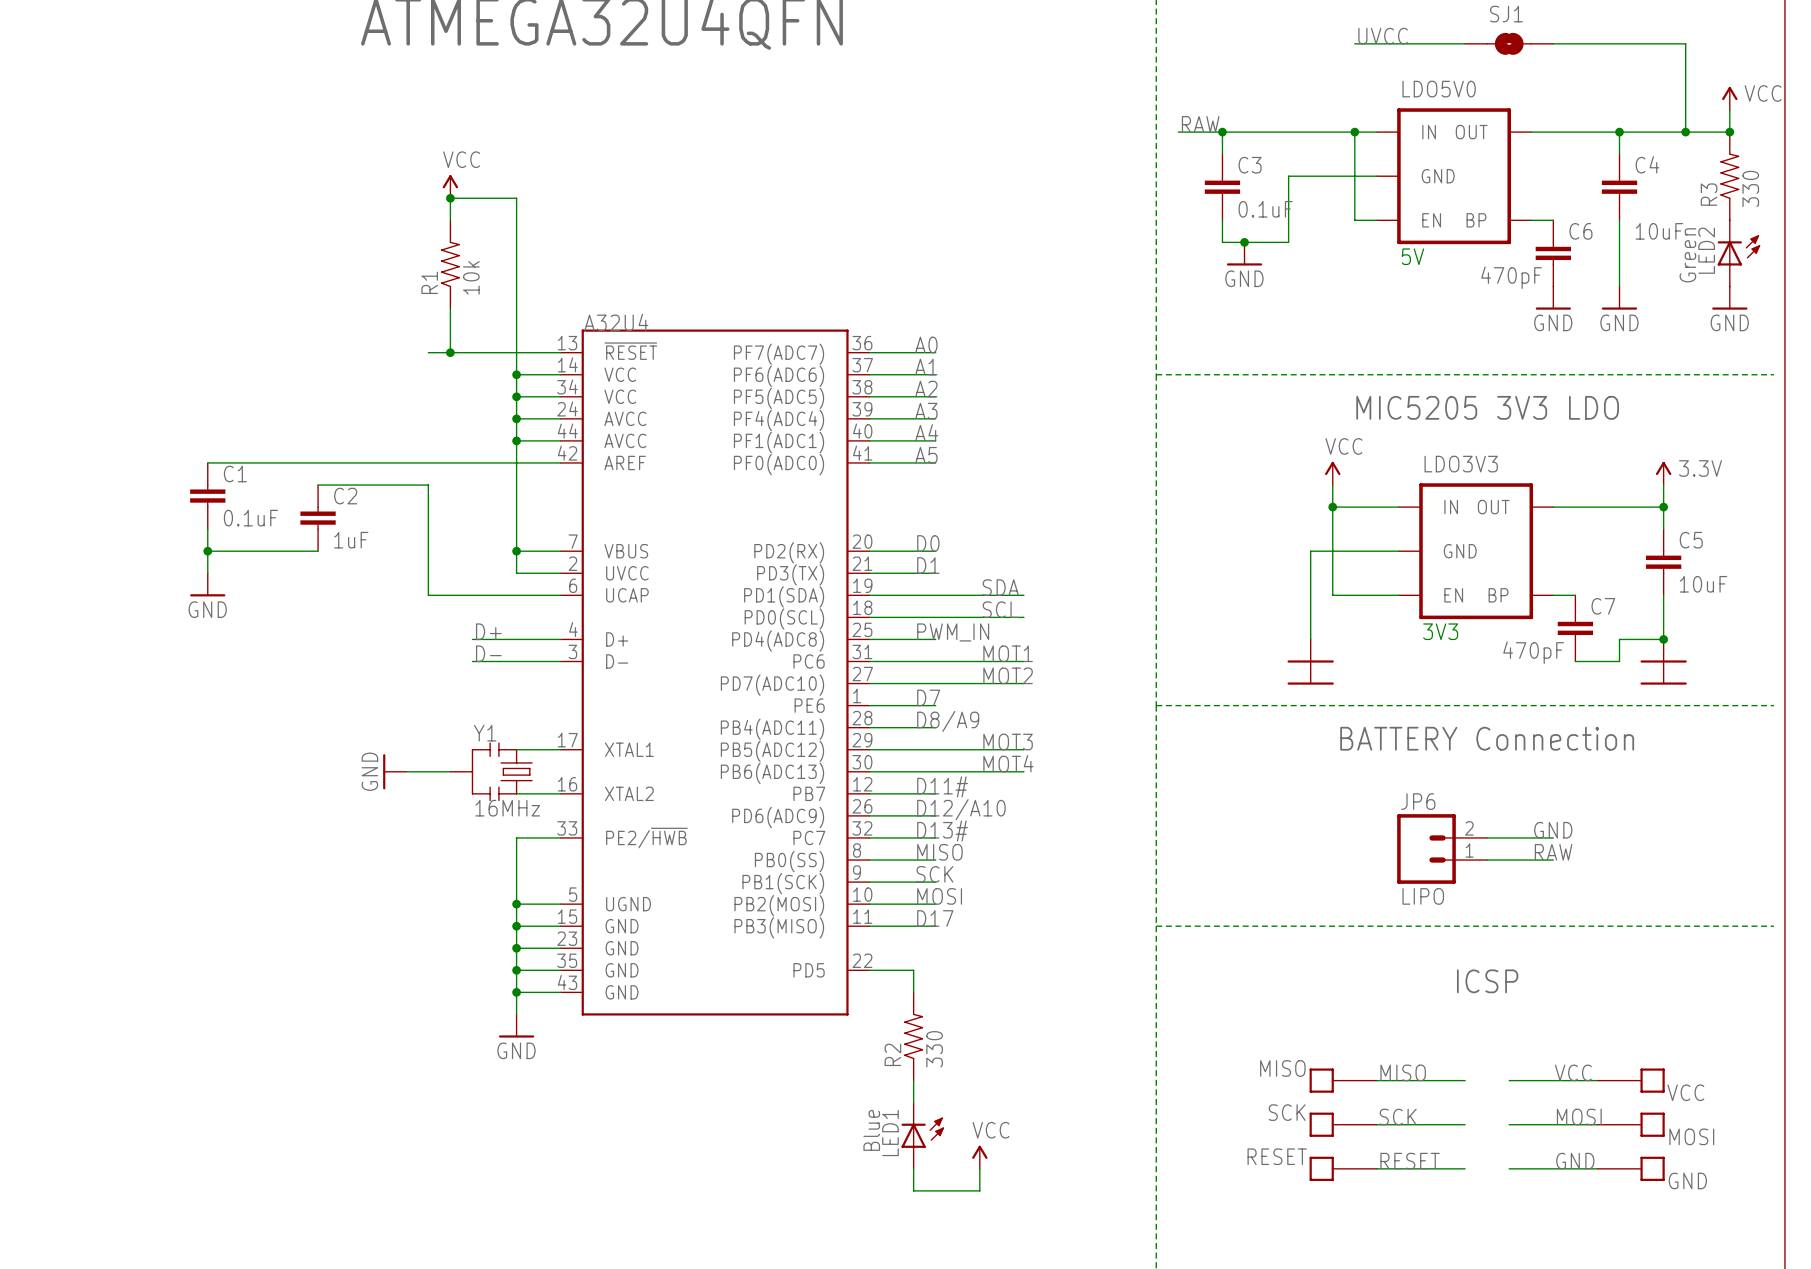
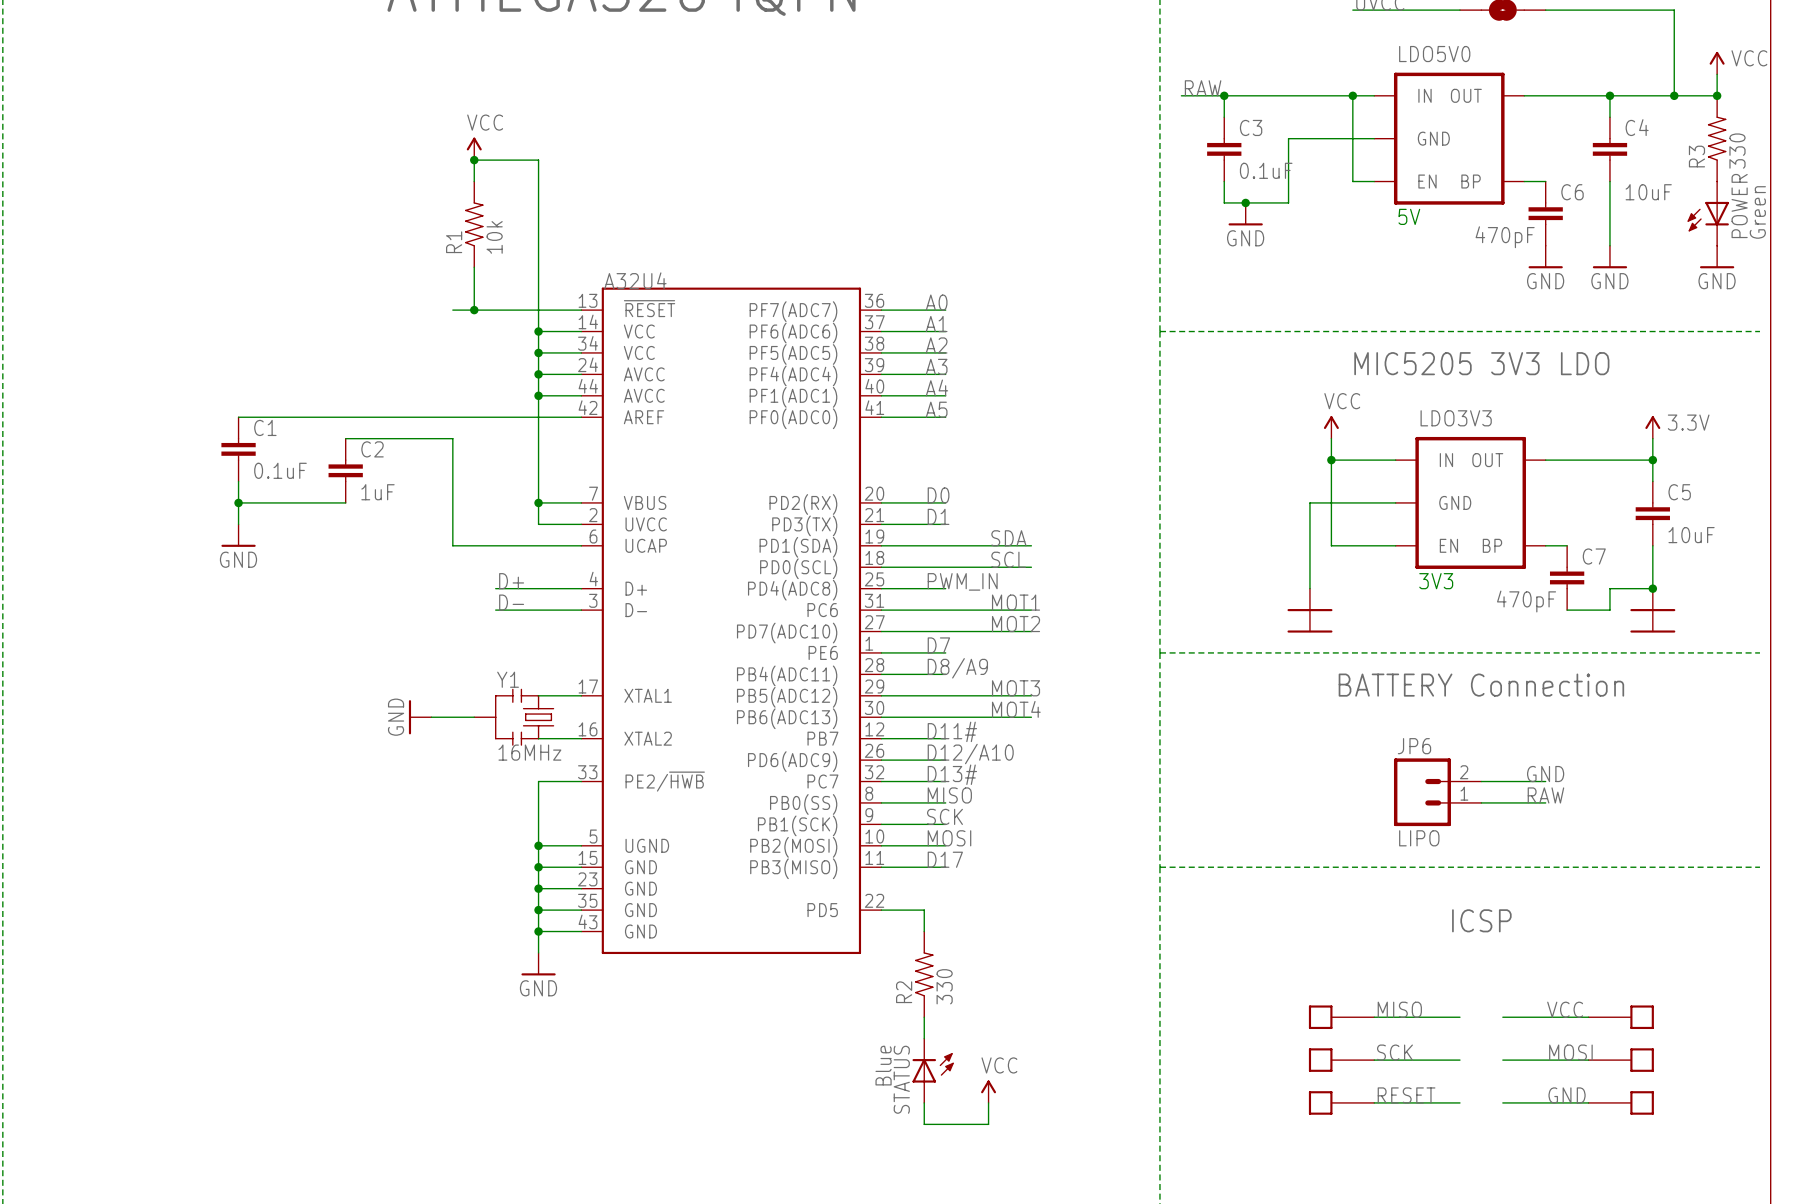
POWER: none -> Green (1708, 213)
LED2: Green (1738, 253) -> none
MISO name: MISO (1282, 1068) -> none
VCC name: VCC (1685, 1092) -> none
SCK name: SCK (1287, 1112) -> none
LED1 name: LED1 (890, 1133) -> STATUS (901, 1079)
MOSI name: MOSI (1691, 1136) -> none
RESET name: RESET (1277, 1156) -> none
GND name: GND (1687, 1180) -> none

